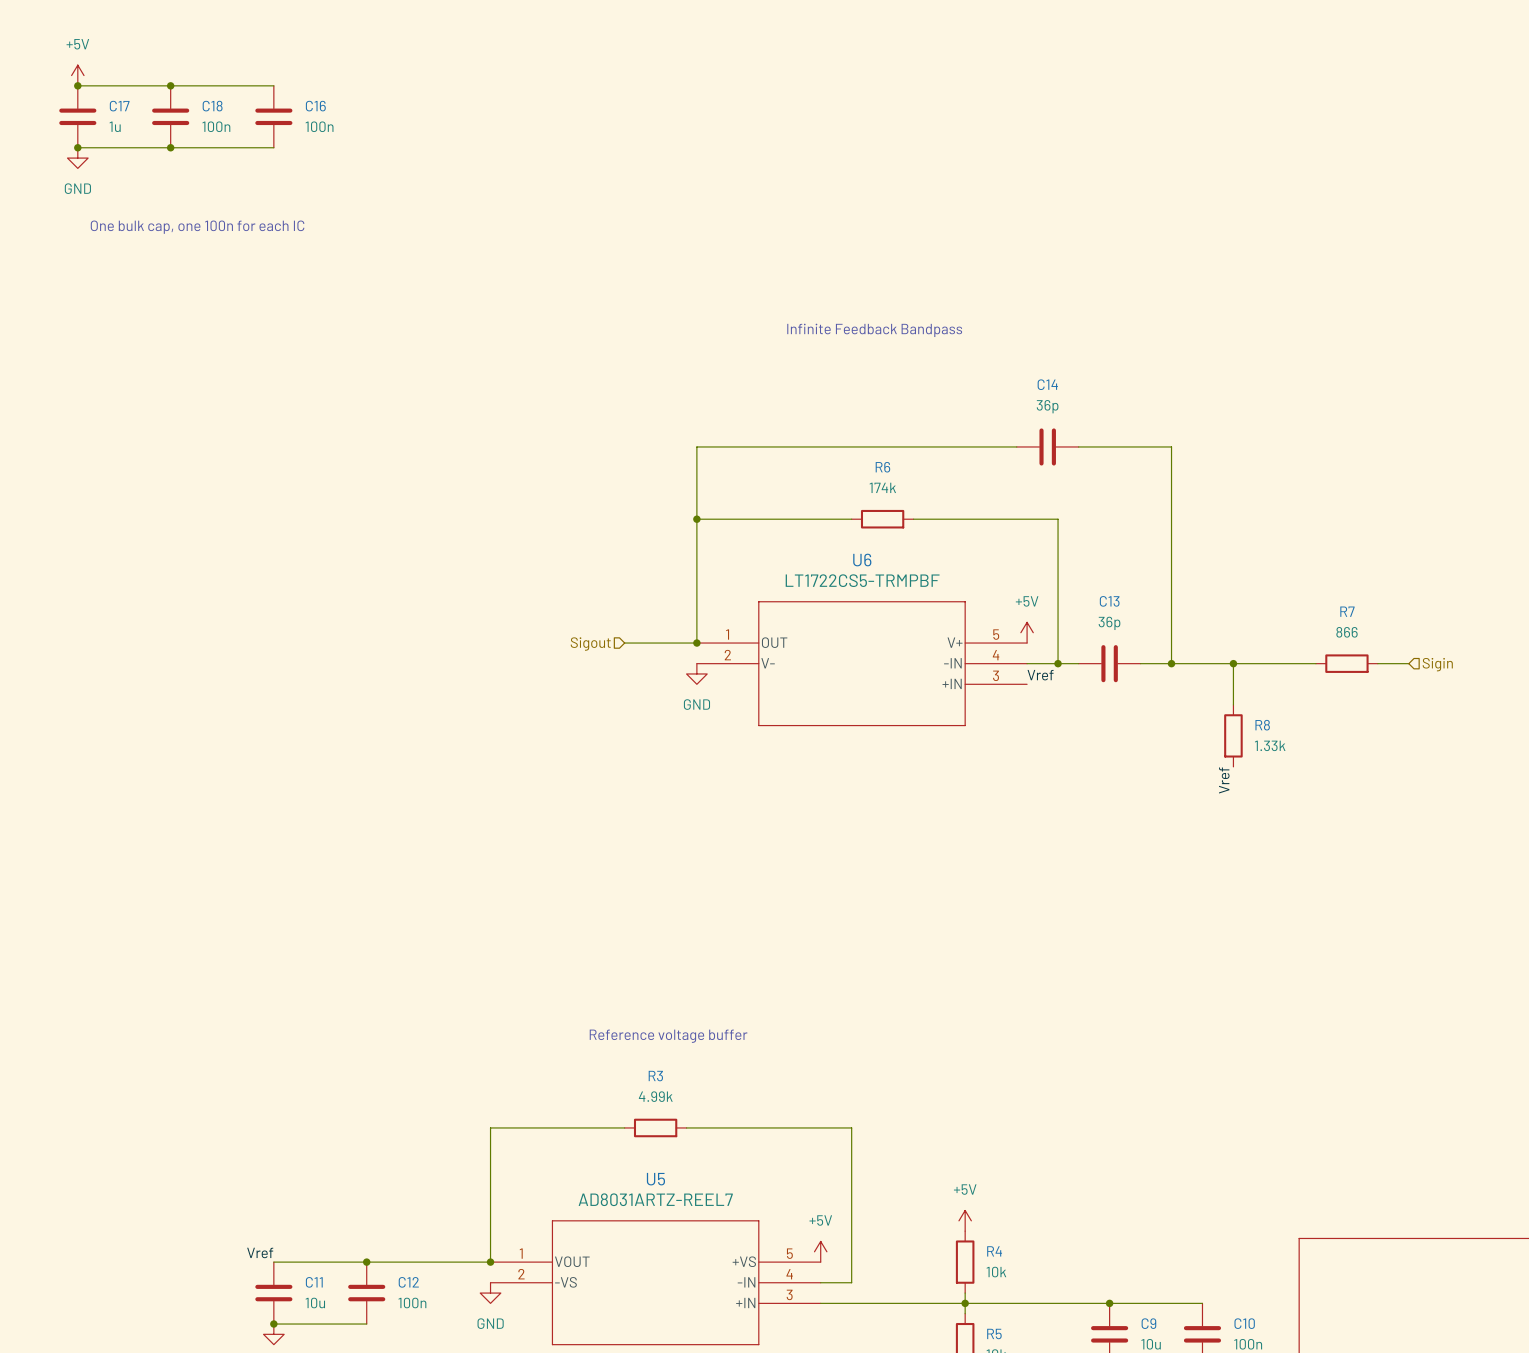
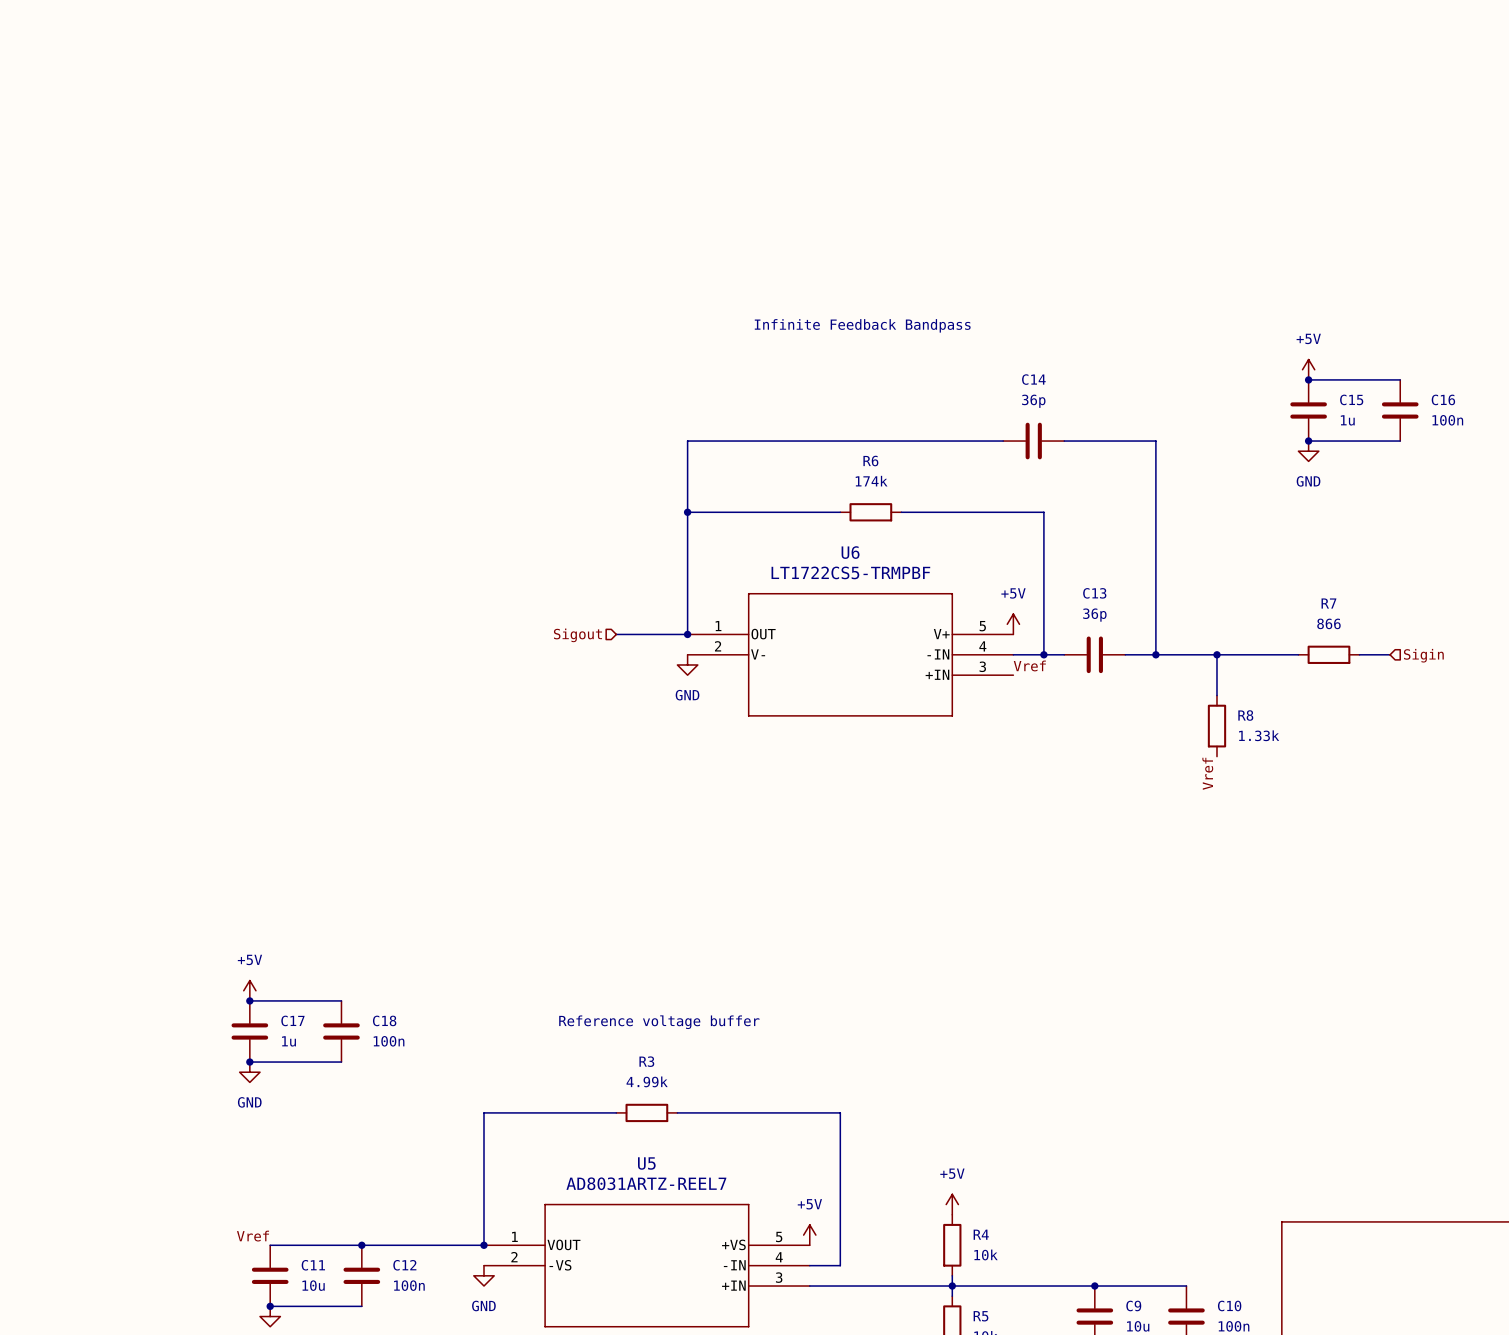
power symbol: +5V (77, 75) -> none
wire: (77, 85) (273, 85) -> none
junction: (77, 85) -> none
junction: (170, 85) -> none
C17 position: (77, 116) -> (249, 1031)
C18 position: (170, 116) -> (341, 1031)
C16 position: (273, 116) -> (1400, 410)
wire: (77, 147) (273, 147) -> none
junction: (77, 147) -> none
junction: (170, 147) -> none
power symbol: GND (77, 158) -> none
text: One bulk cap, one 100n for each IC (197, 227) -> none
power symbol: none -> +5V (1308, 369)
wire: none -> (1308, 379) (1400, 379)
junction: none -> (1308, 379)
C15: none -> 1u (1308, 410)
wire: none -> (1308, 441) (1400, 441)
junction: none -> (1308, 441)
power symbol: none -> GND (1308, 451)
power symbol: none -> +5V (249, 990)
wire: none -> (249, 1000) (341, 1000)
junction: none -> (249, 1000)
wire: none -> (249, 1062) (341, 1062)
junction: none -> (249, 1062)
power symbol: none -> GND (249, 1072)

